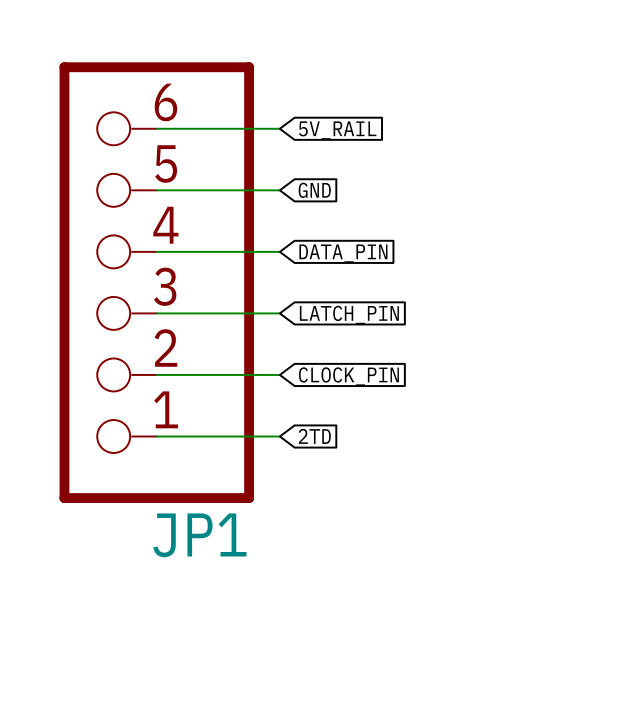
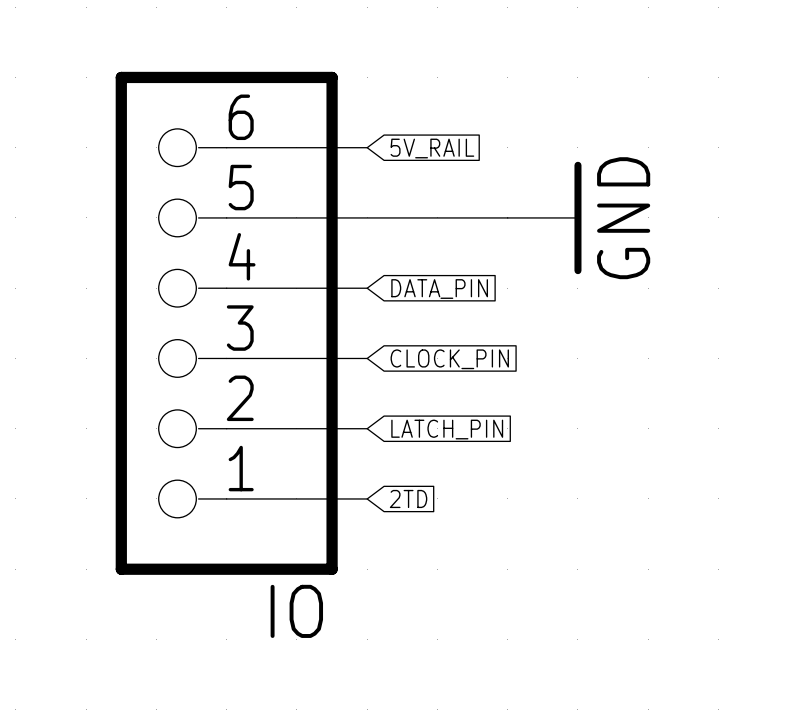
wire: none -> (367, 217) (507, 217)
global label: GND (314, 190) -> none
power symbol: none -> GND (544, 217)
global label: LATCH_PIN (349, 315) -> CLOCK_PIN (449, 359)
global label: CLOCK_PIN (348, 376) -> LATCH_PIN (447, 429)
JP1 name: JP1 (199, 535) -> IO (296, 611)

